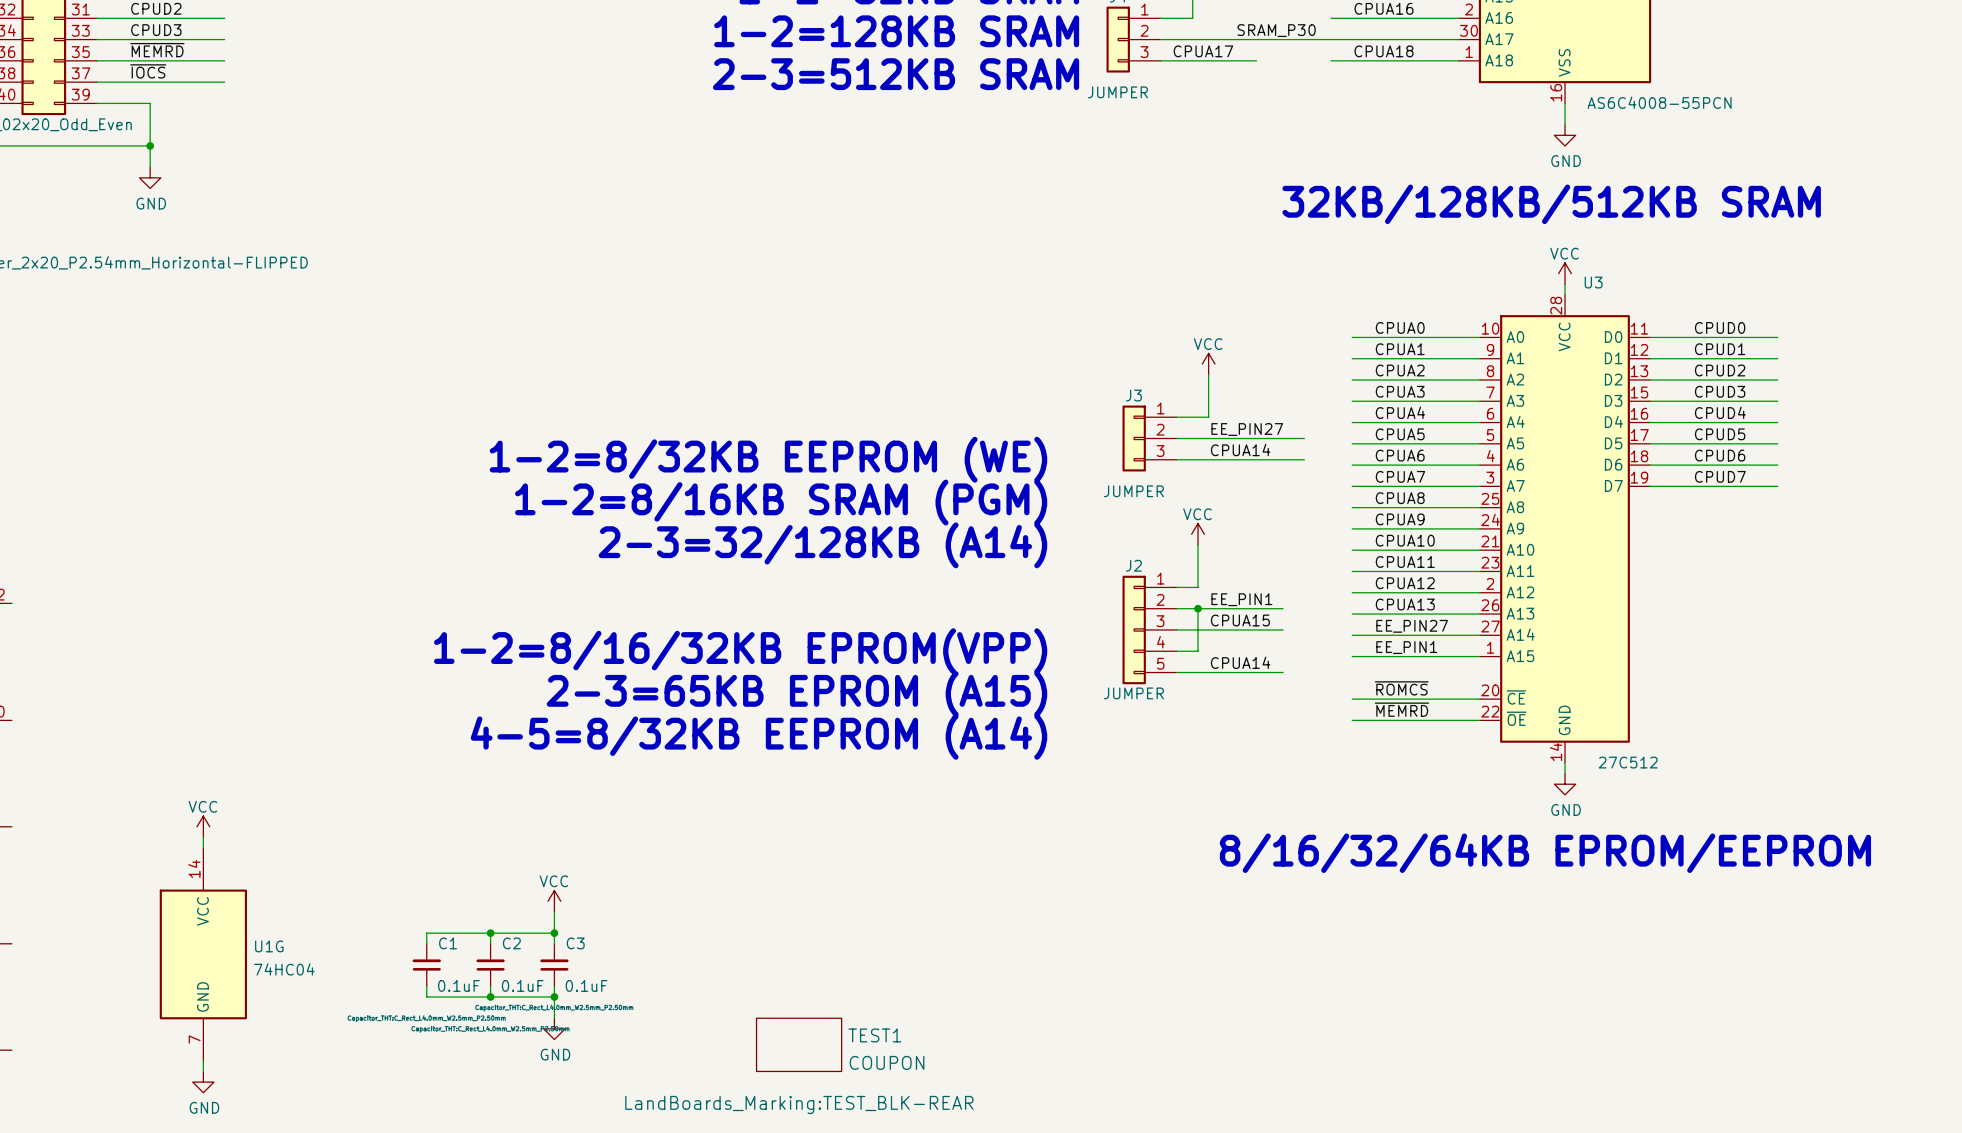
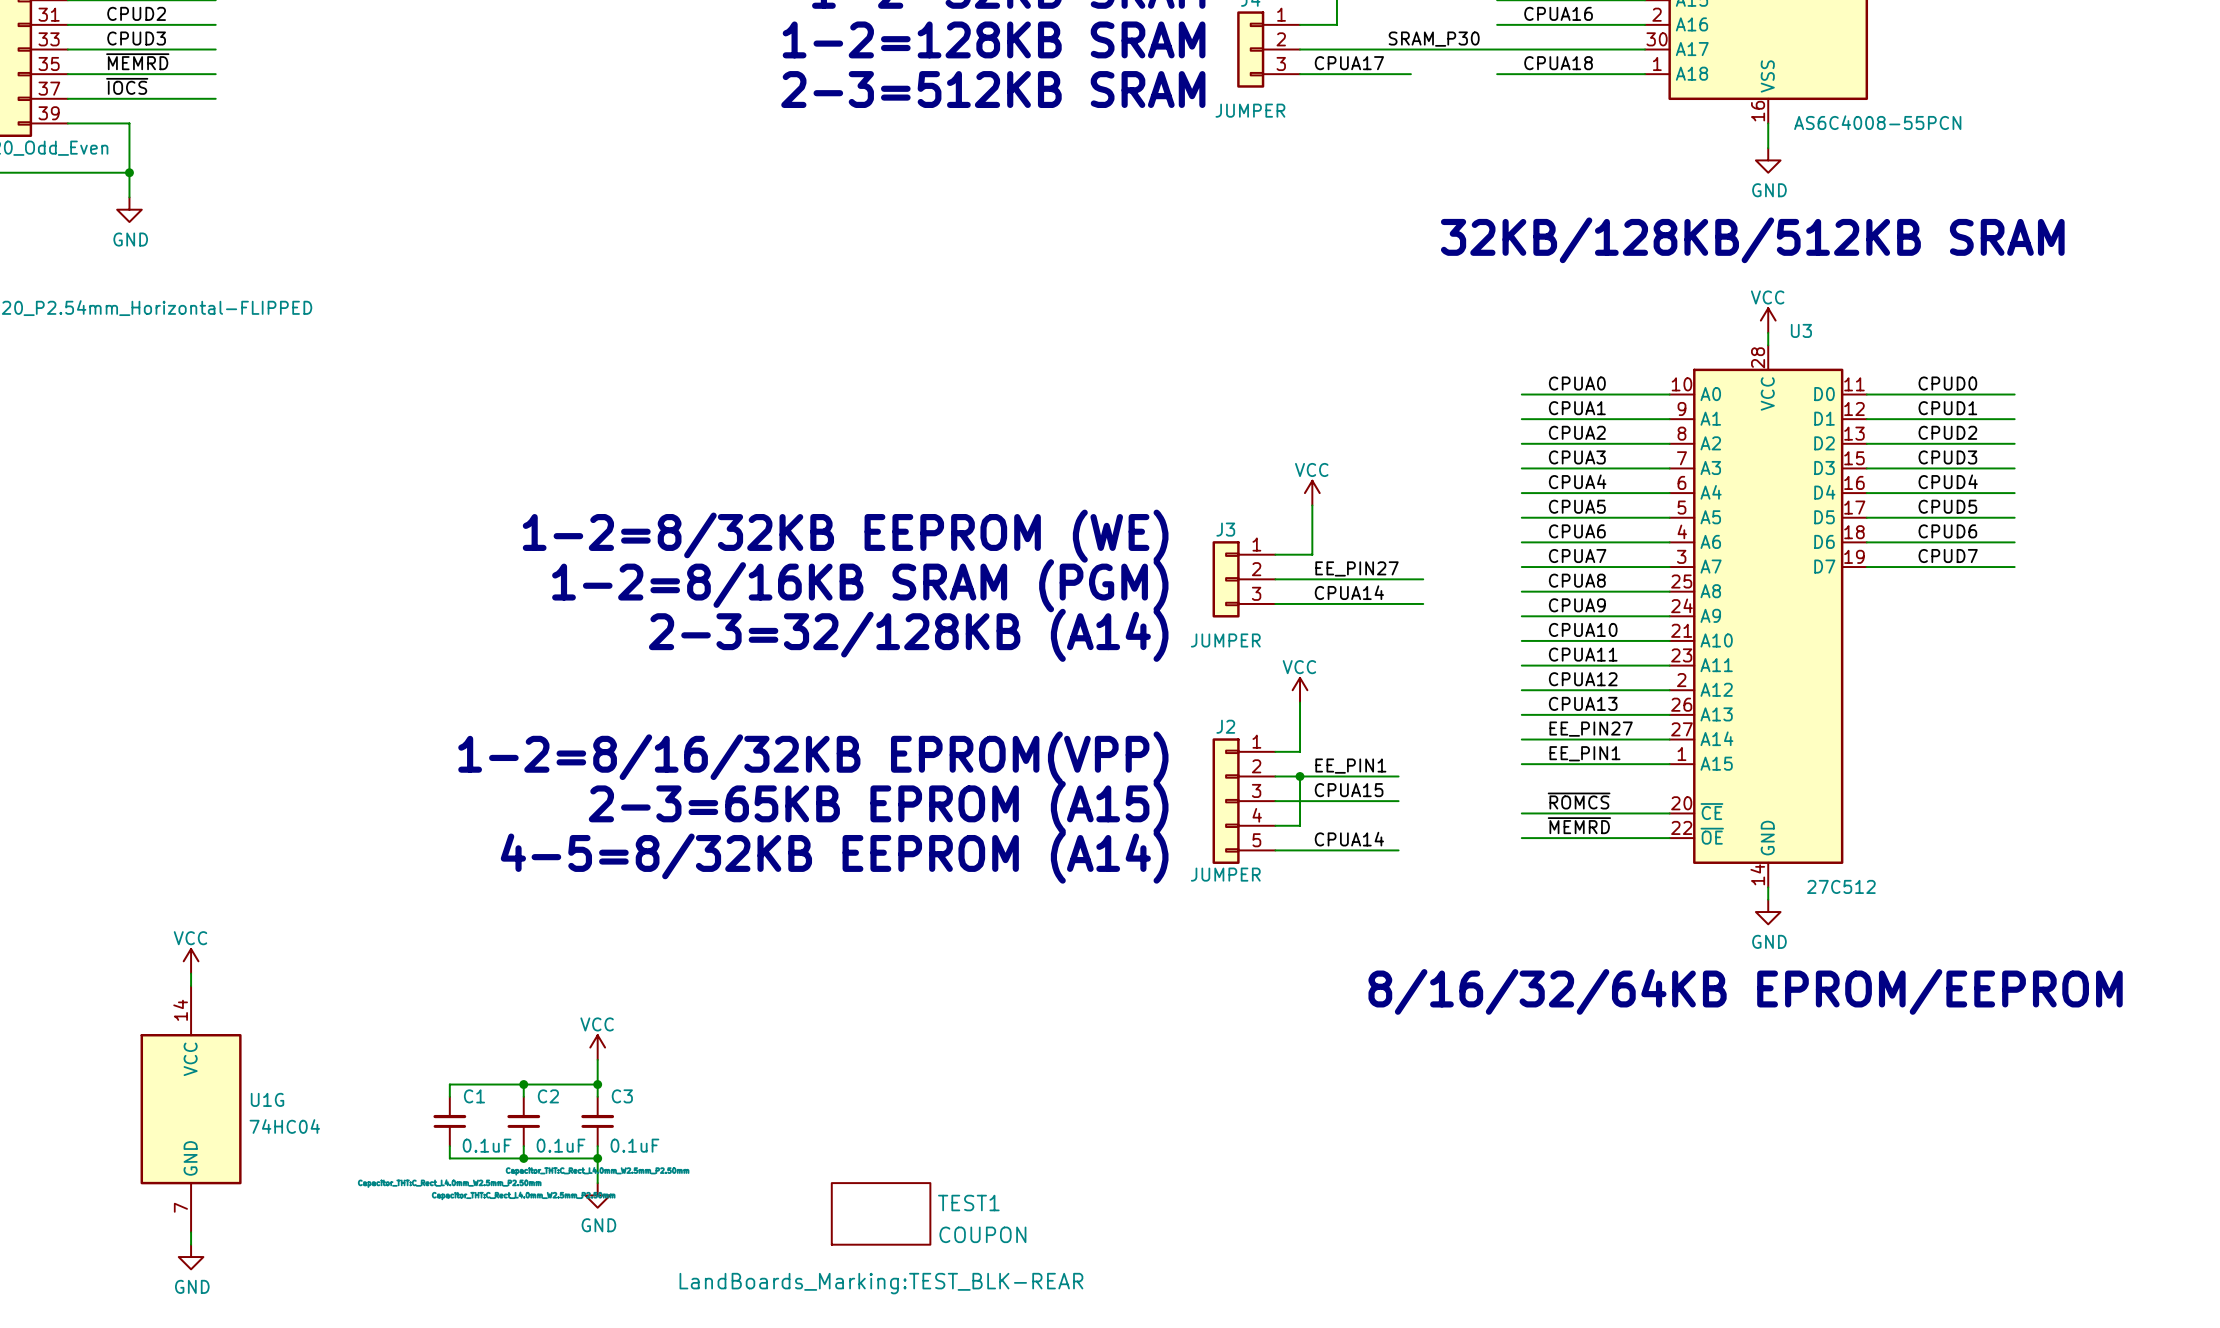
power symbol: VCC (1208, 364) -> none
wire: (1208, 374) (1208, 417) (1176, 417) -> (1312, 505) (1312, 554) (1275, 554)
power symbol: none -> VCC (1312, 493)
label position: EE_PIN27 (1247, 429) -> EE_PIN27 (1357, 568)
J3 position: (1149, 438) -> (1243, 579)
wire: (1176, 438) (1304, 438) -> (1275, 579) (1423, 579)
label position: CPUA14 (1240, 450) -> CPUA14 (1349, 592)
wire: (1176, 459) (1304, 459) -> (1275, 603) (1423, 603)
power symbol: VCC (1198, 534) -> none
wire: (1198, 544) (1198, 587) (1176, 587) -> (1300, 702) (1300, 751) (1275, 751)
power symbol: none -> VCC (1300, 690)
label position: EE_PIN1 (1241, 599) -> EE_PIN1 (1350, 766)
wire: (1176, 608) (1283, 608) -> (1275, 776) (1398, 776)
wire: (1198, 608) (1198, 651) (1176, 651) -> (1300, 776) (1300, 825) (1275, 825)
junction: (1198, 608) -> none
label position: CPUA15 (1240, 620) -> CPUA15 (1349, 790)
J2 position: (1149, 629) -> (1243, 801)
wire: (1176, 629) (1283, 629) -> (1275, 801) (1398, 801)
label position: CPUA14 (1240, 662) -> CPUA14 (1349, 839)
junction: none -> (1300, 776)
wire: (1176, 672) (1283, 672) -> (1275, 850) (1398, 850)

